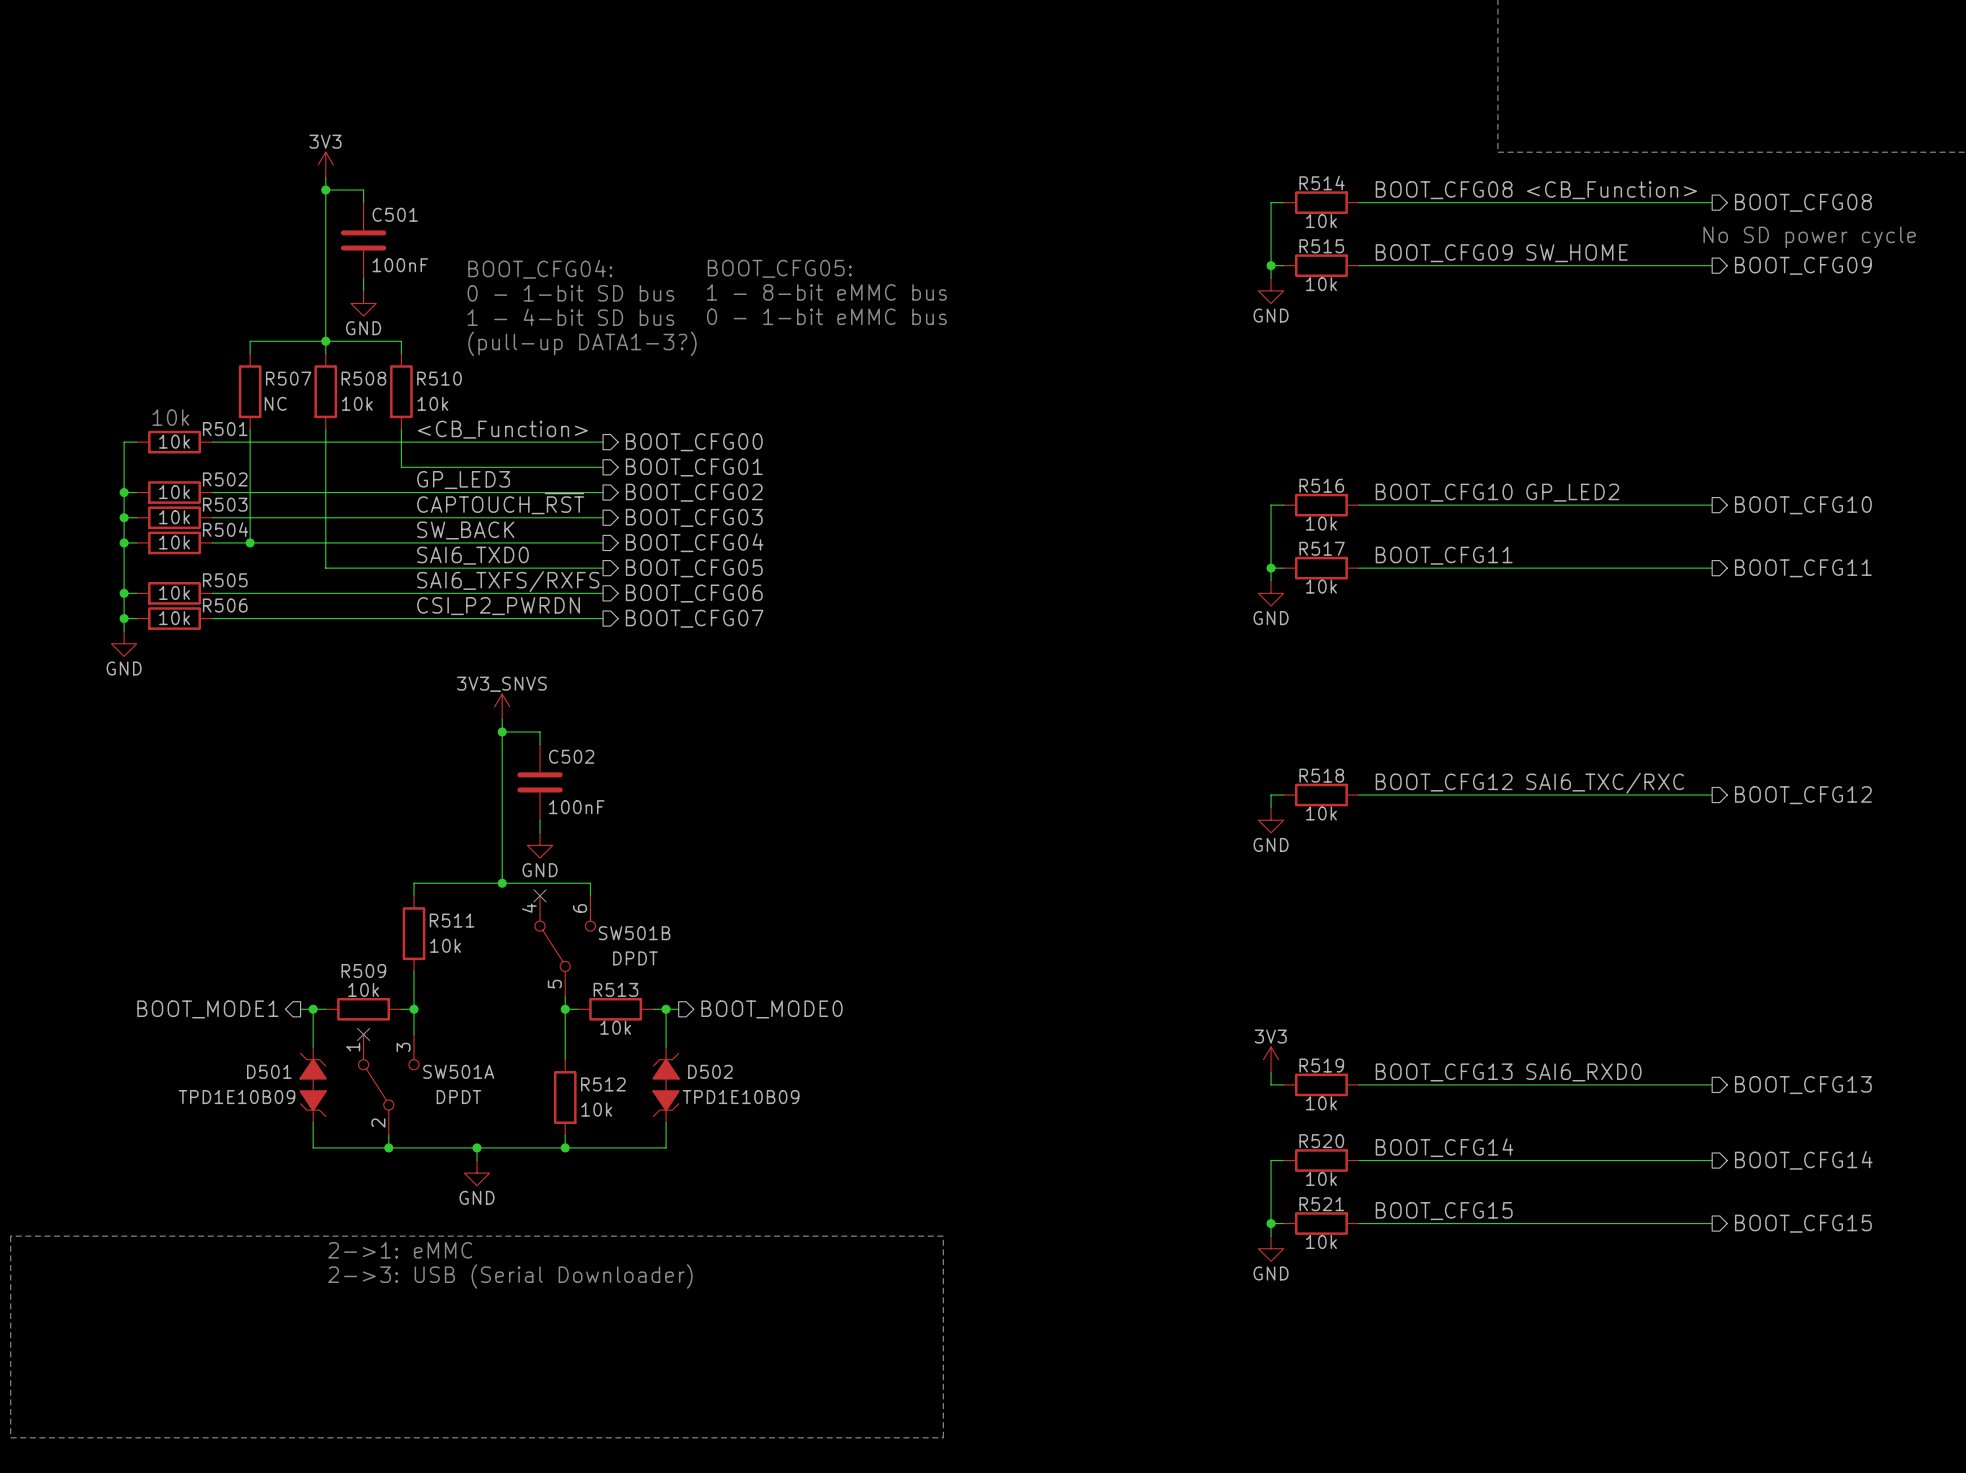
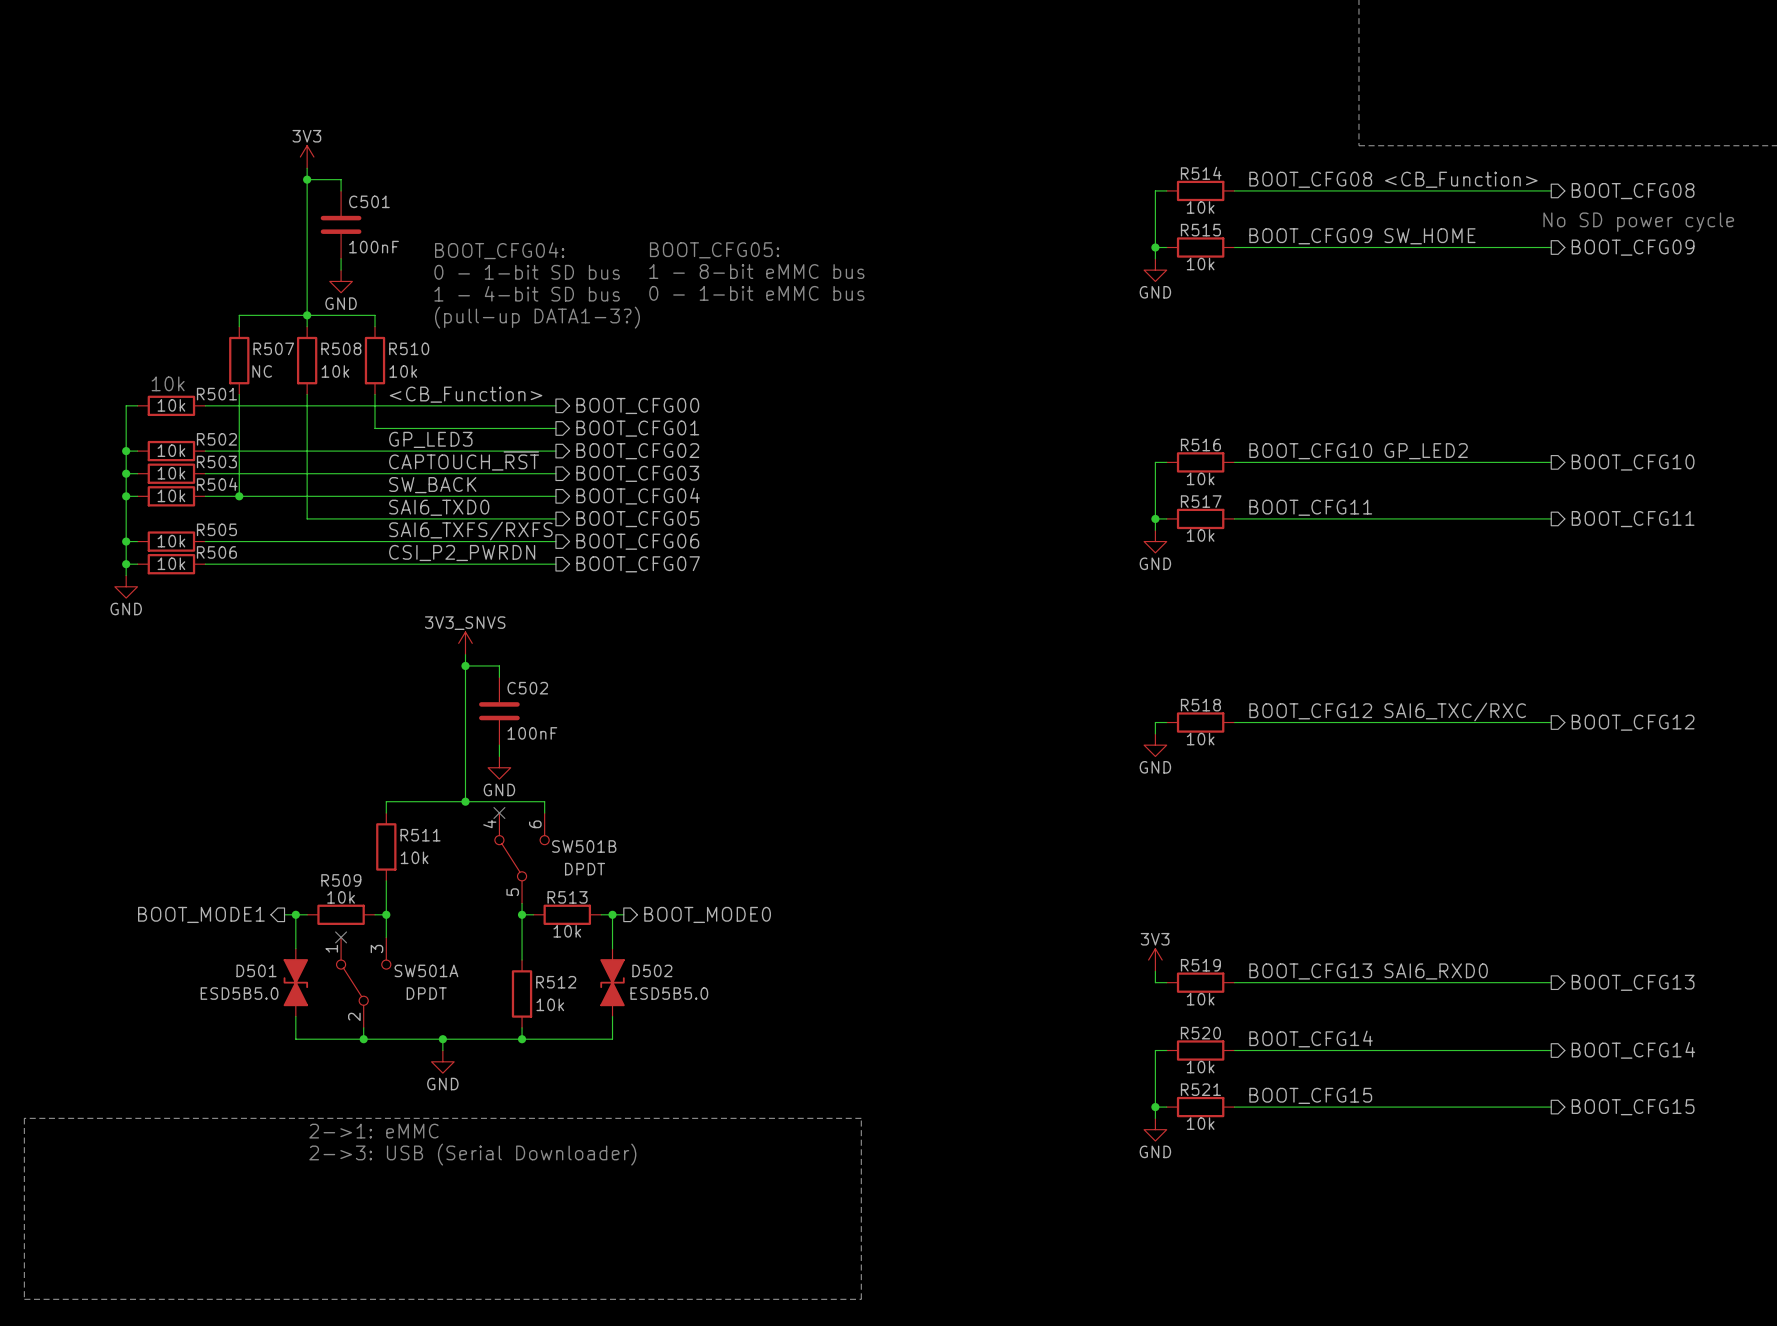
D501 symbol: [299, 1047, 327, 1123] -> [283, 948, 309, 1017]
D502 symbol: [652, 1047, 680, 1123] -> [600, 948, 625, 1017]
D501 value: TPD1E10B09 (236, 1097) -> ESD5B5.0 (239, 993)
D502 value: TPD1E10B09 (741, 1097) -> ESD5B5.0 (669, 993)

